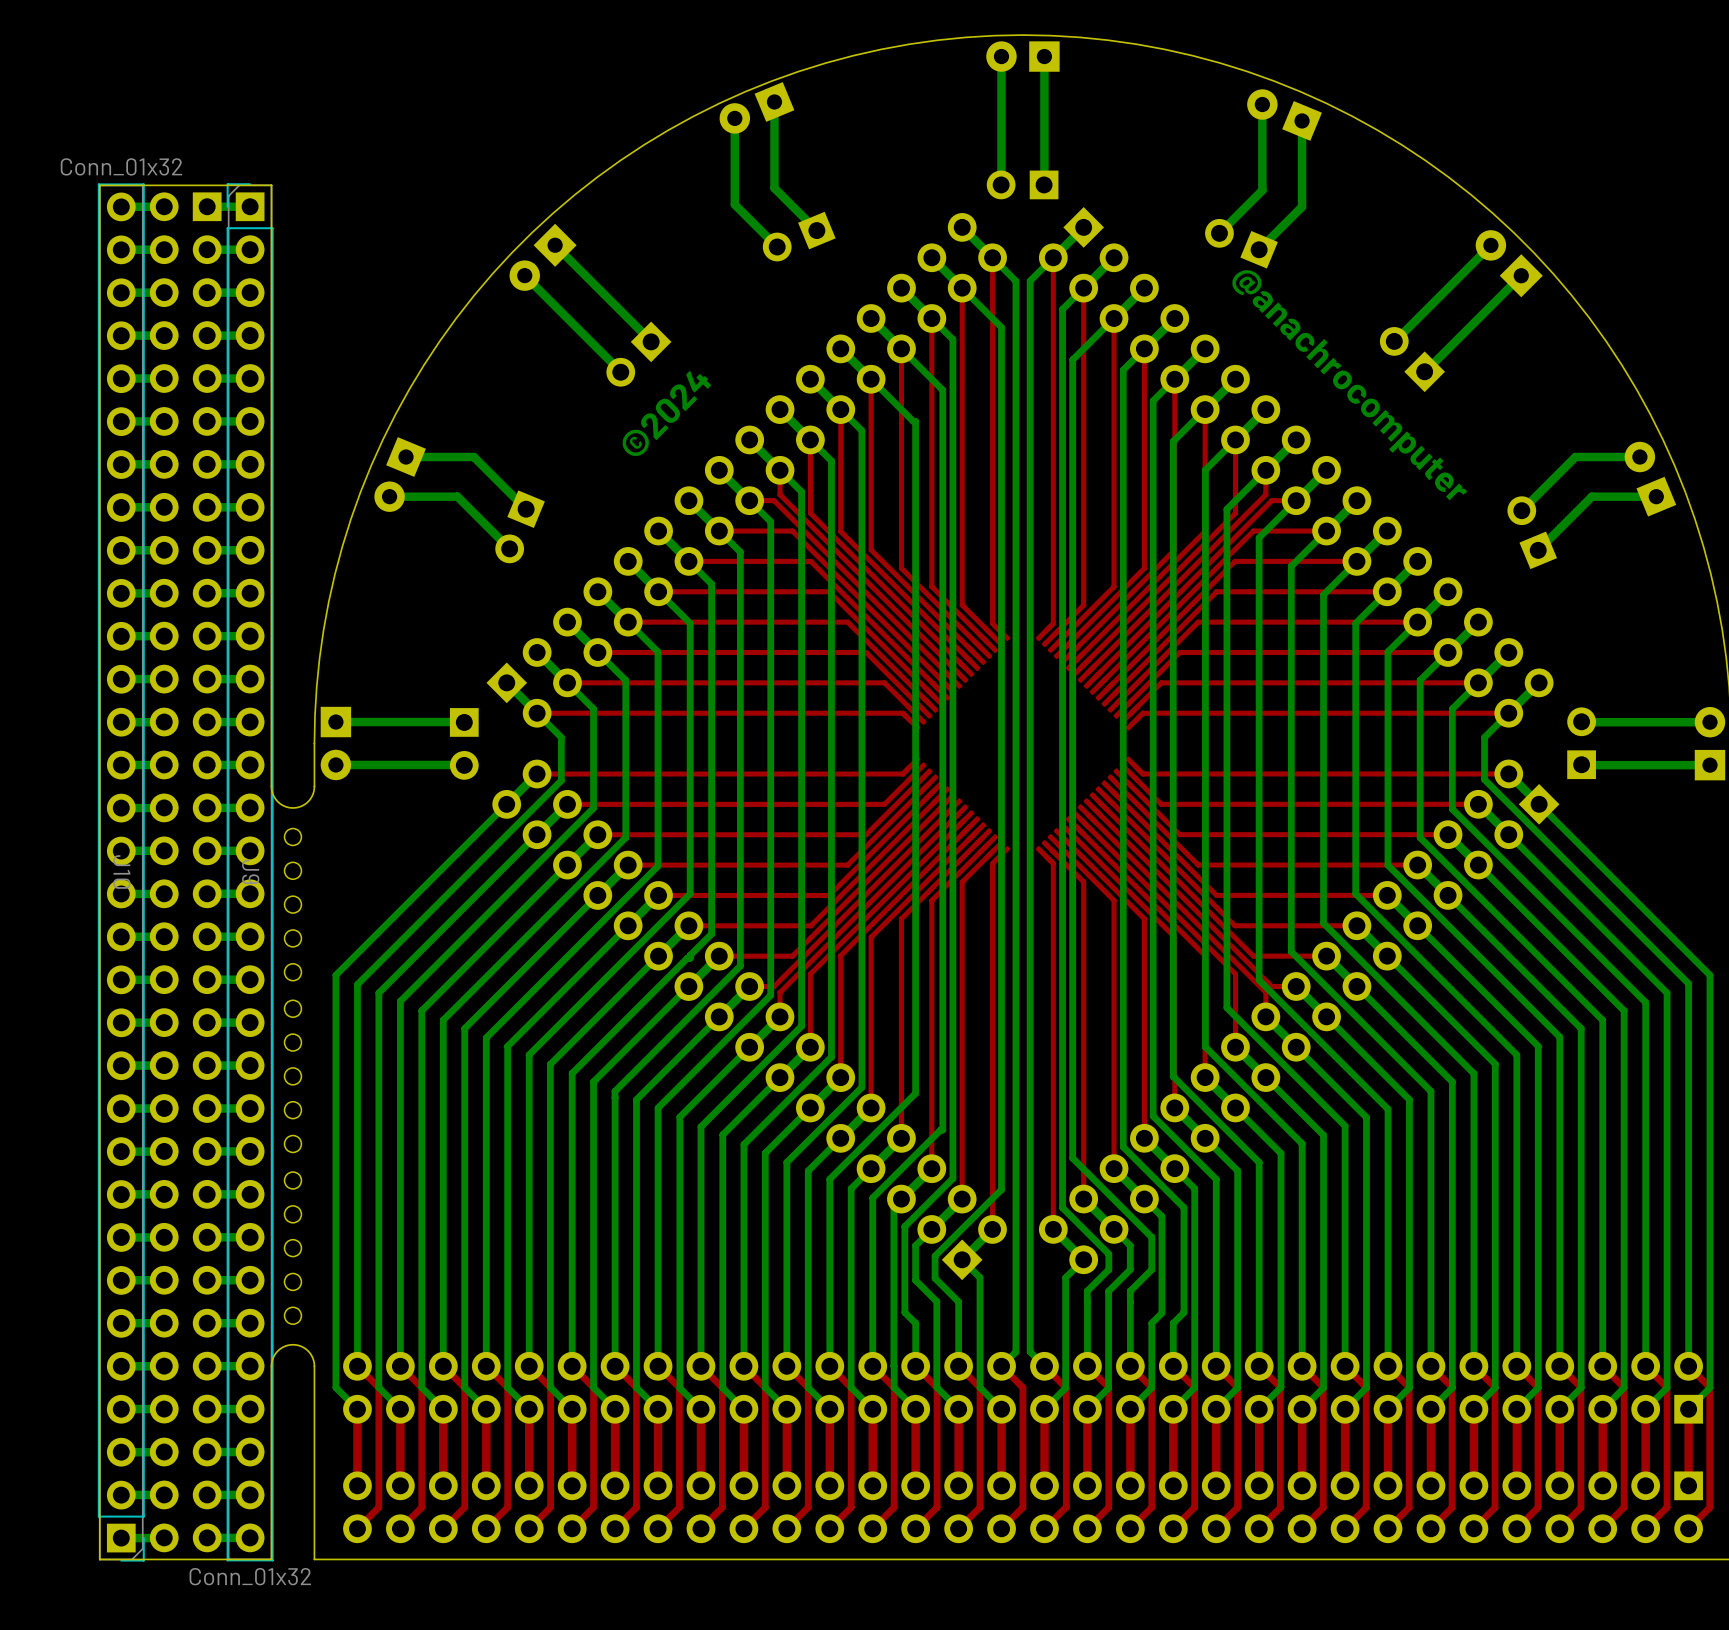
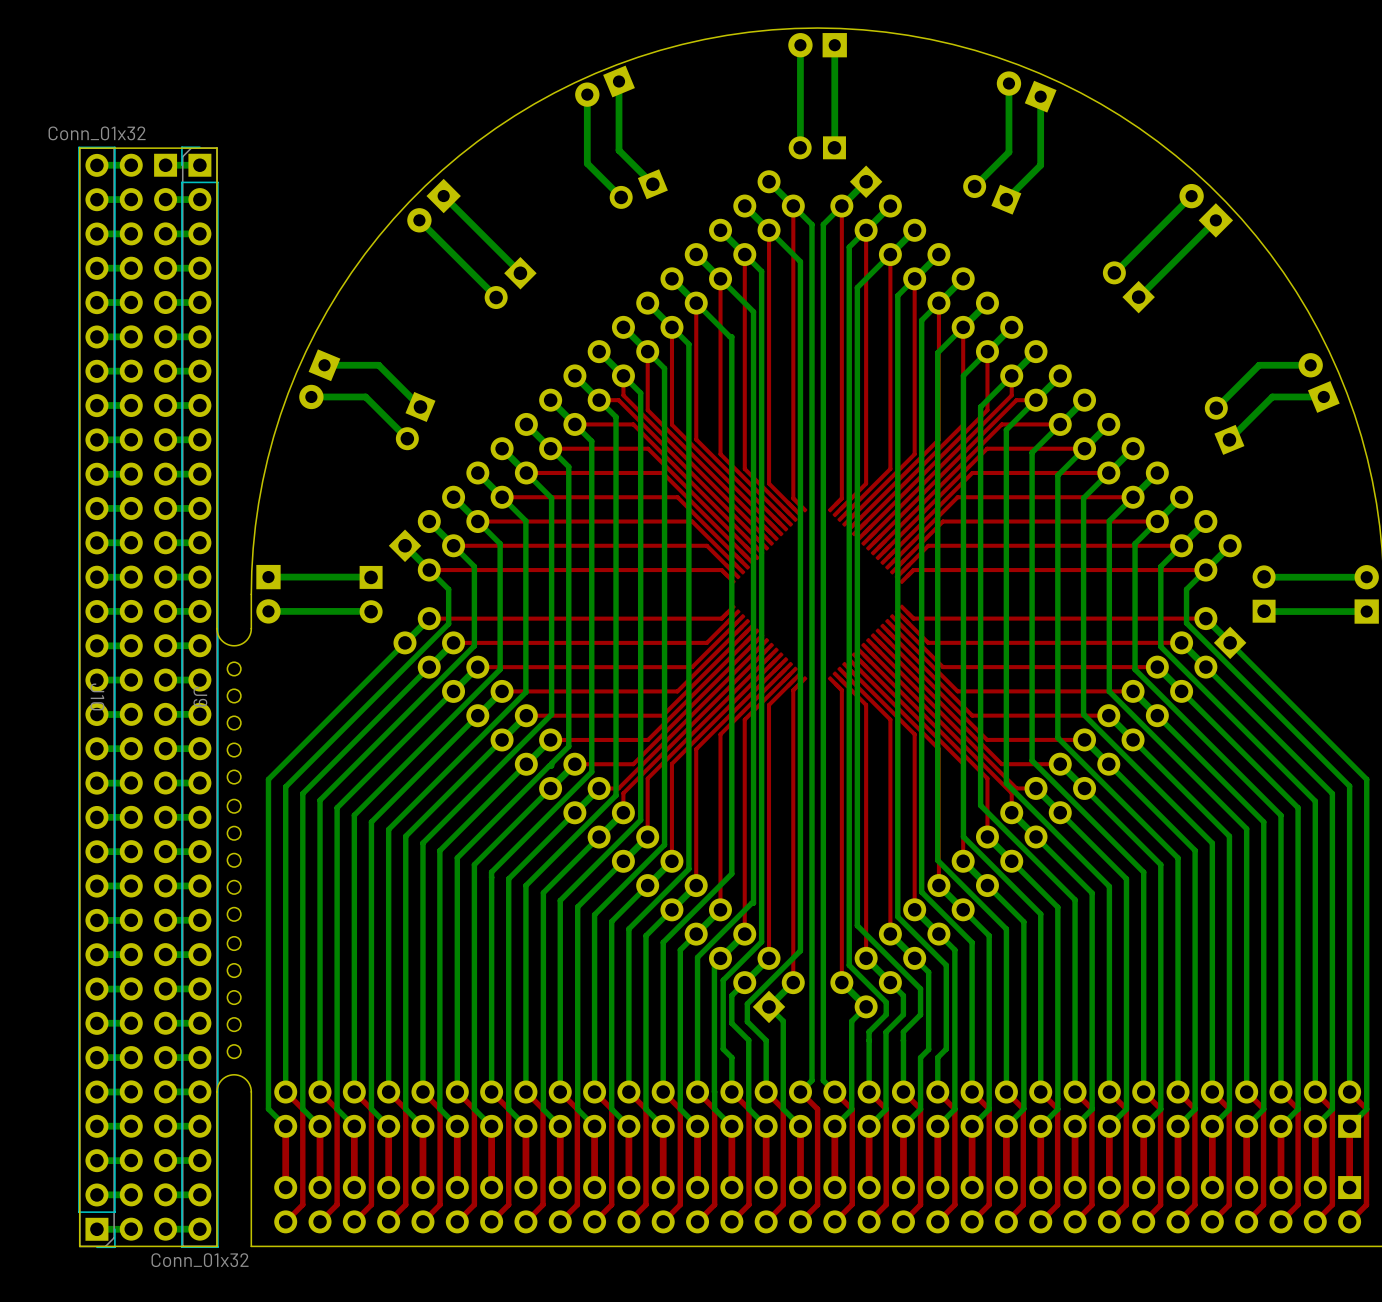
text: @anachrocomputer (1349, 384) -> none
text: ©2024 (666, 413) -> none

